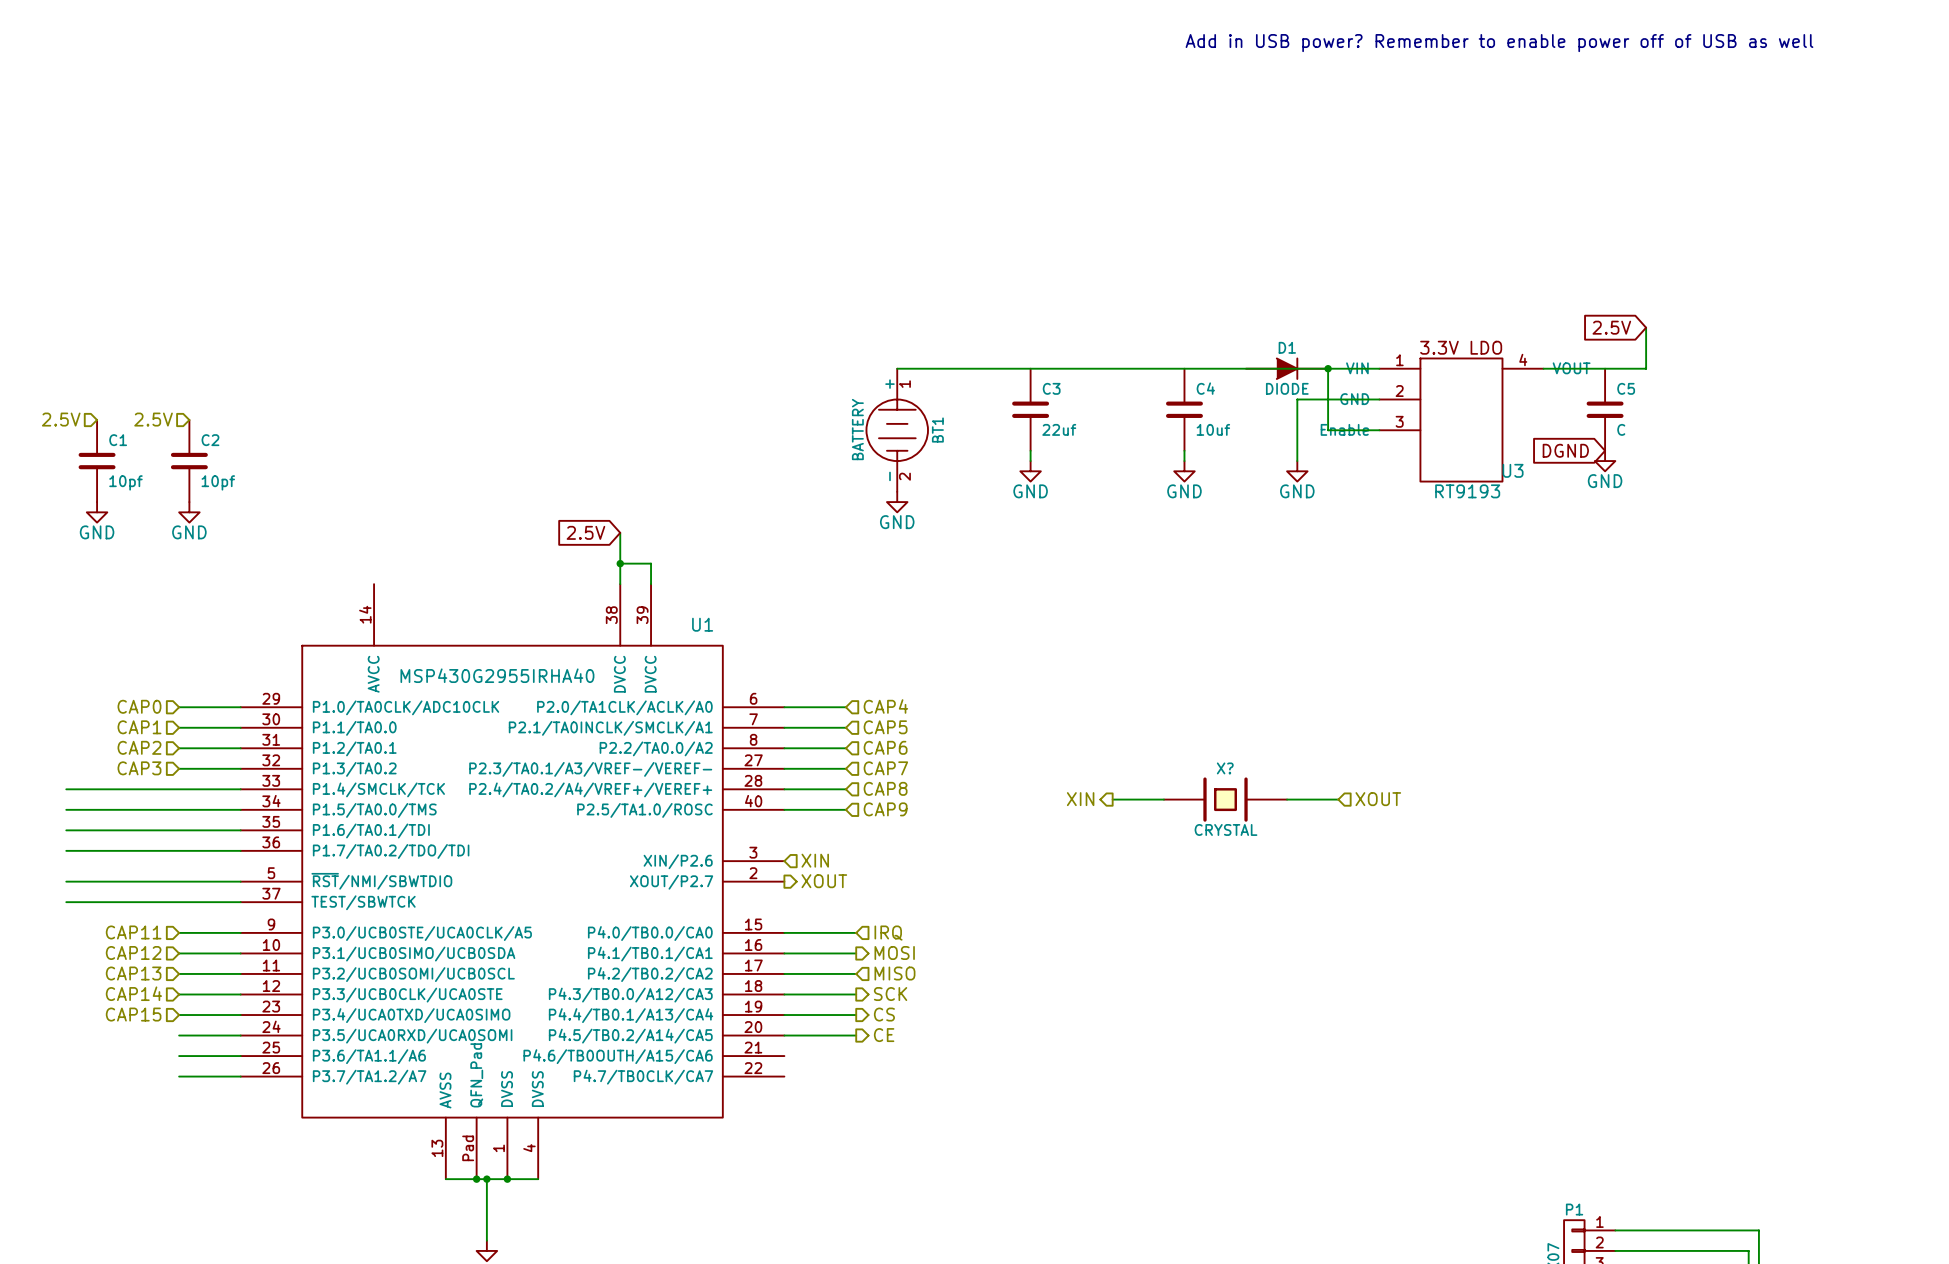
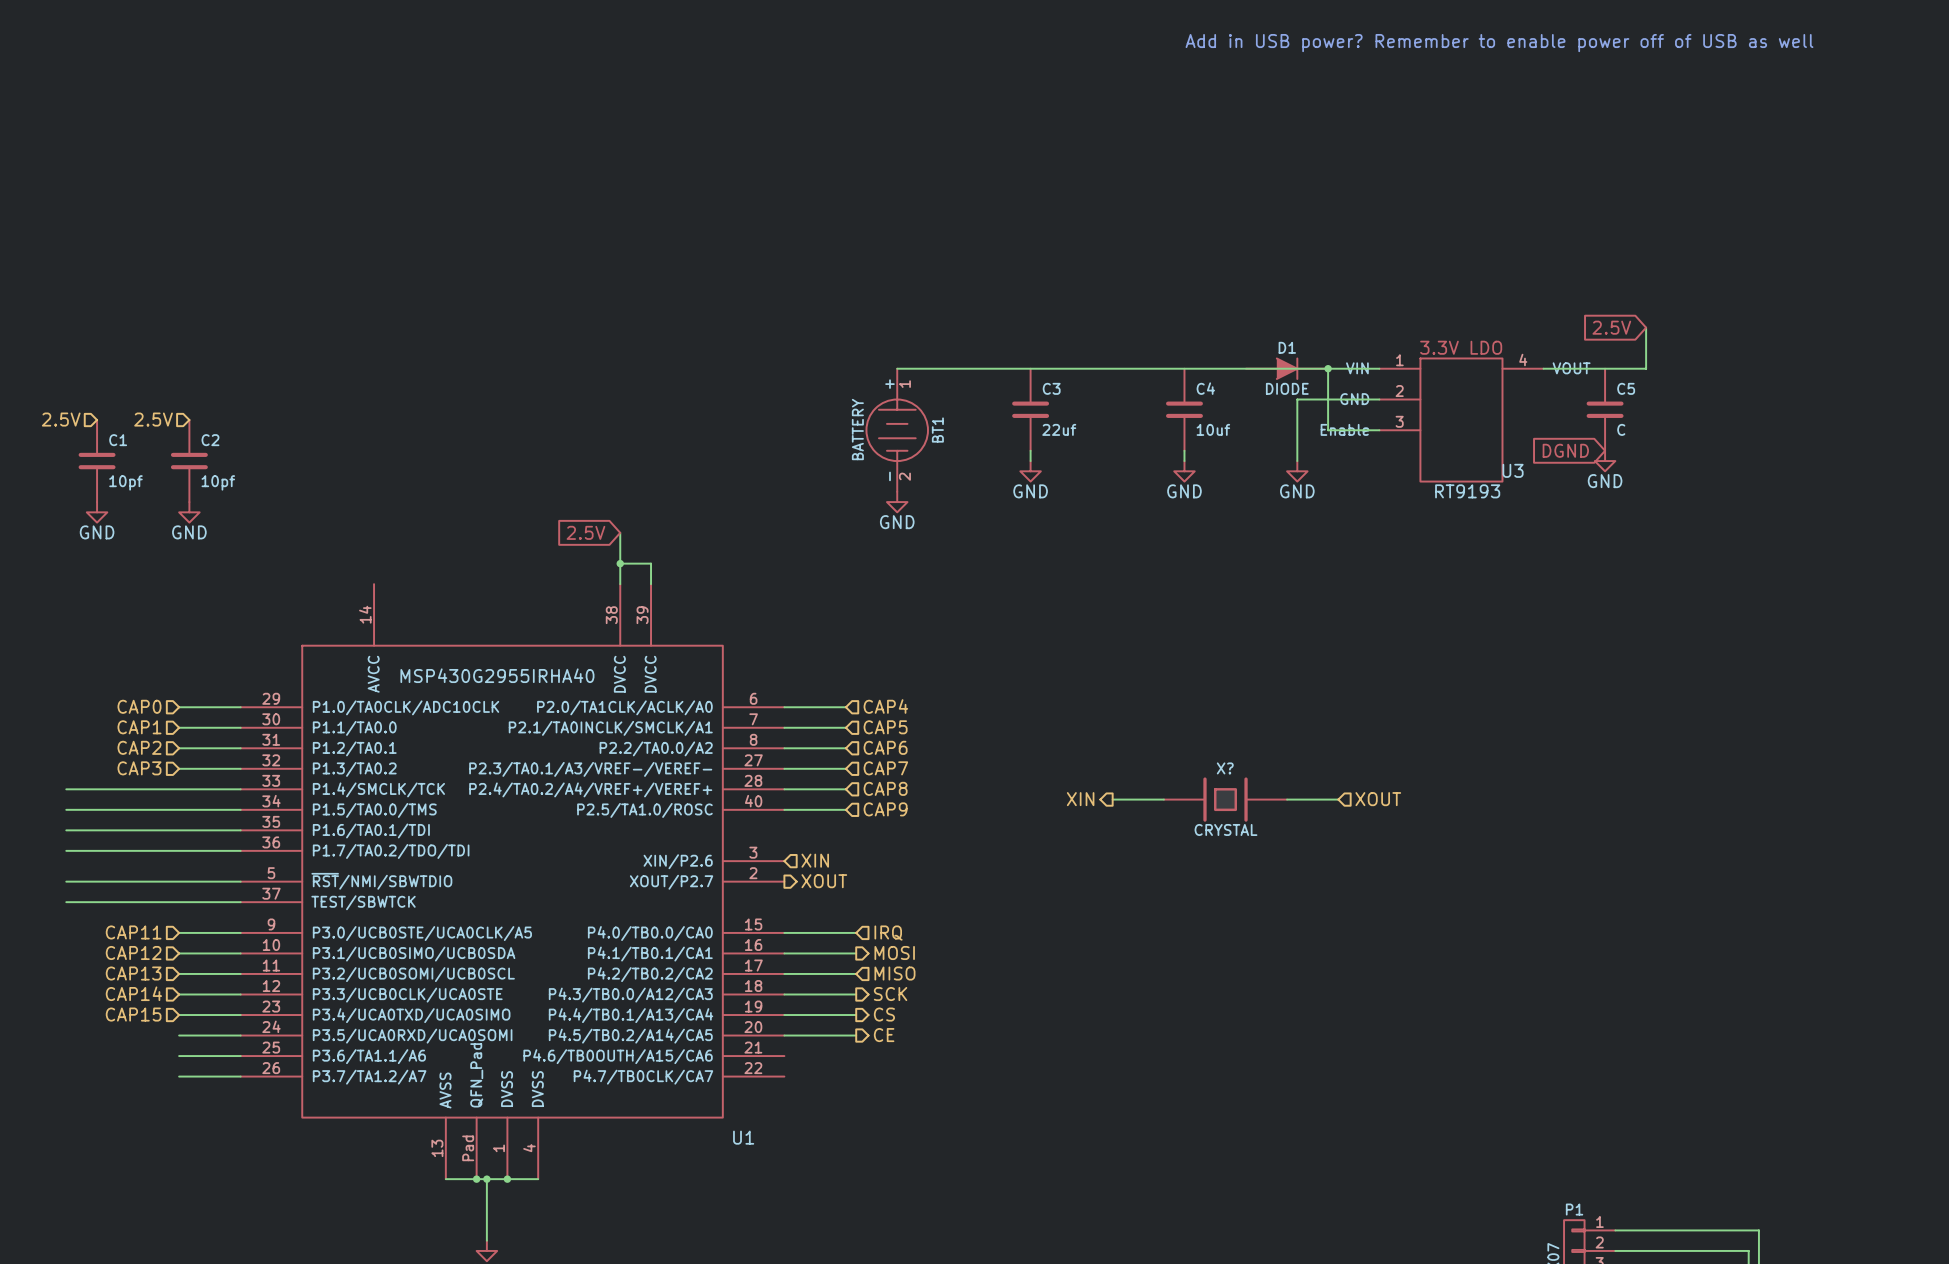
U1 name position: U1 (702, 624) -> U1 (743, 1137)

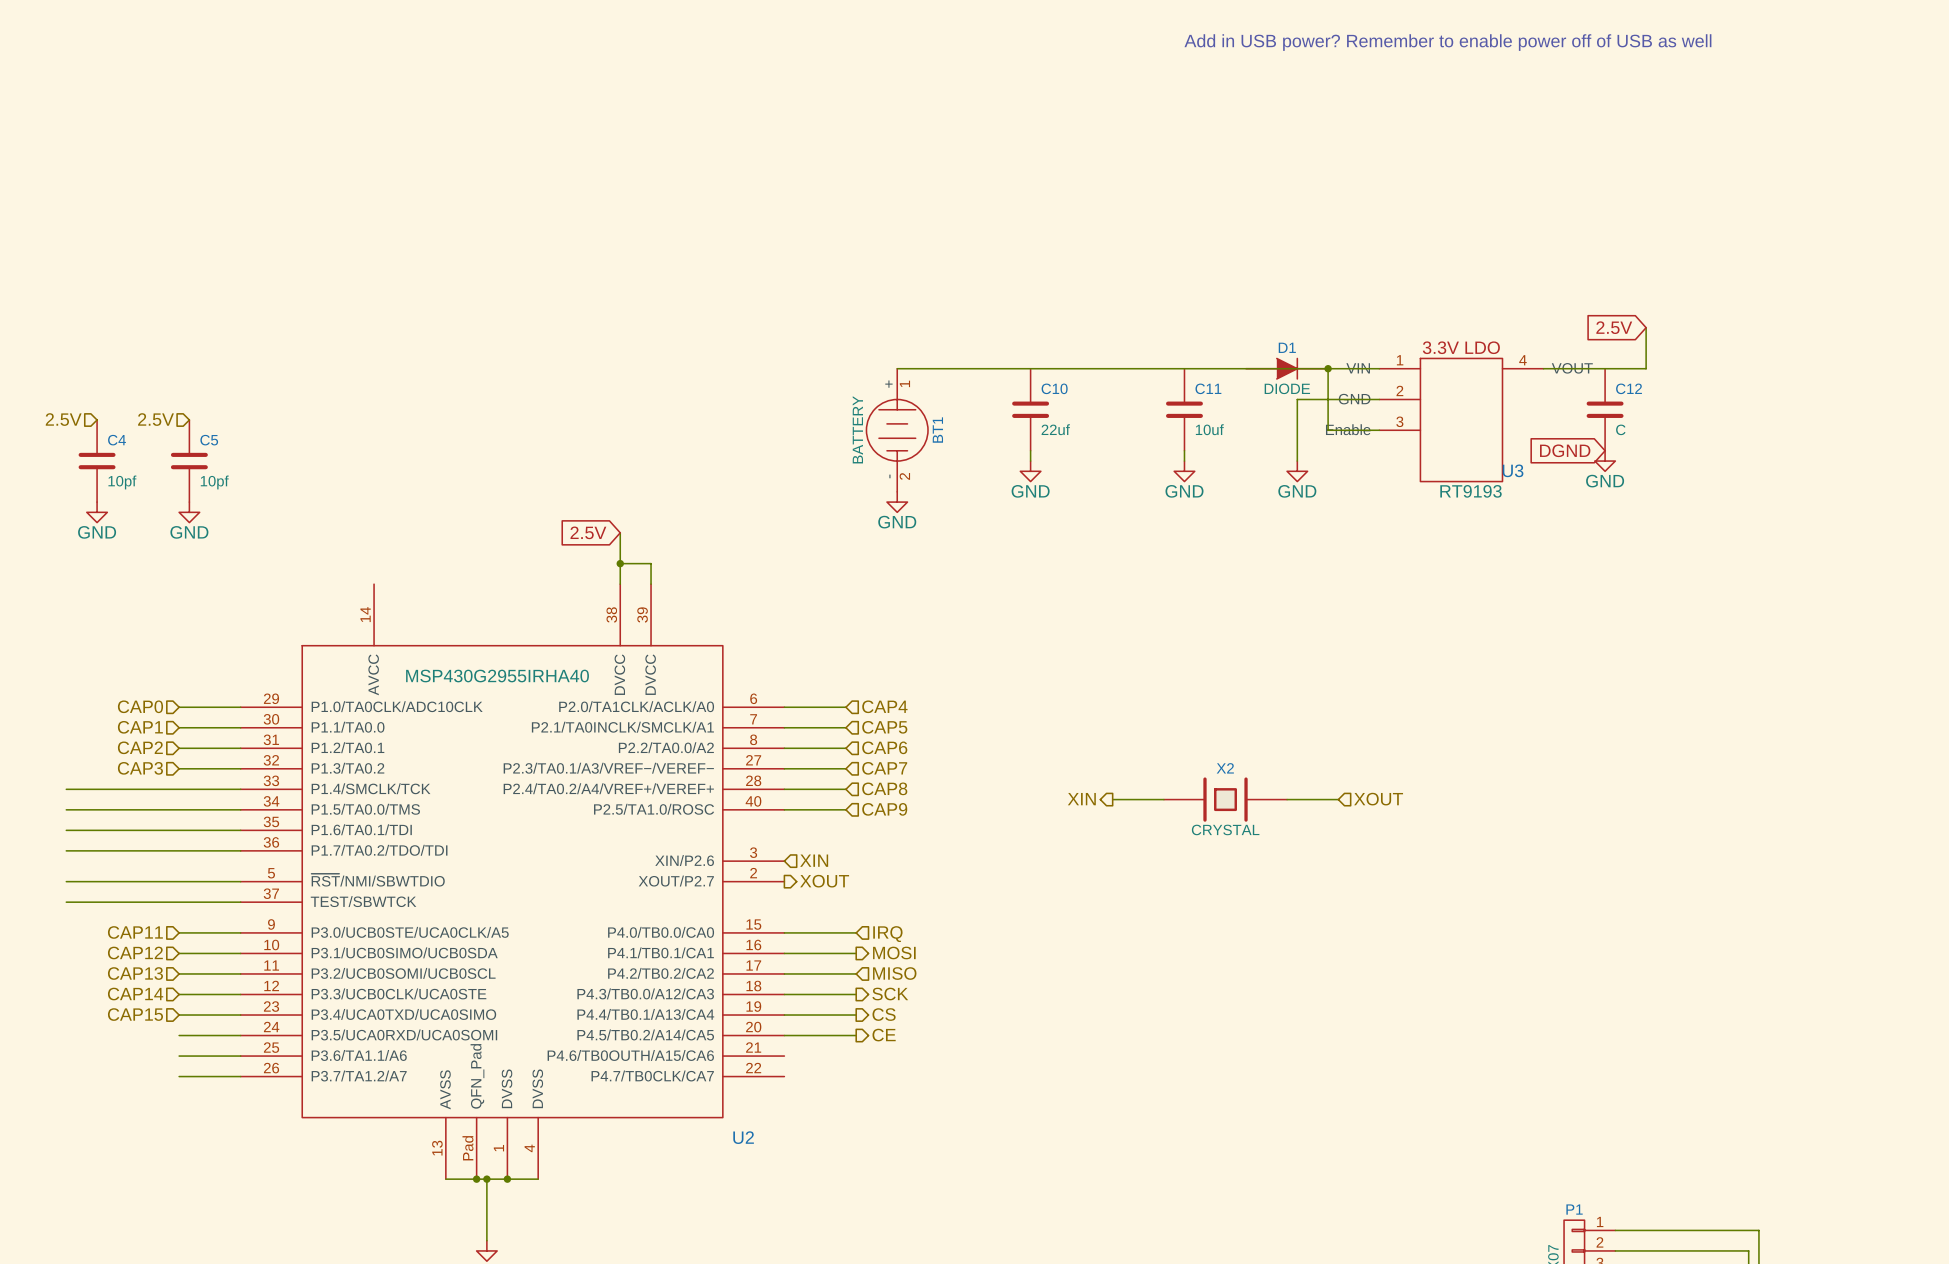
C3 name: C3 (1051, 388) -> C10 (1054, 388)
C4 name: C4 (1205, 388) -> C11 (1208, 388)
C5 name: C5 (1626, 388) -> C12 (1629, 388)
C1 name: C1 (118, 440) -> C4 (117, 440)
C2 name: C2 (210, 440) -> C5 (209, 440)
X? name: X? (1225, 768) -> X2 (1225, 768)
U1 name: U1 (743, 1137) -> U2 (743, 1137)

